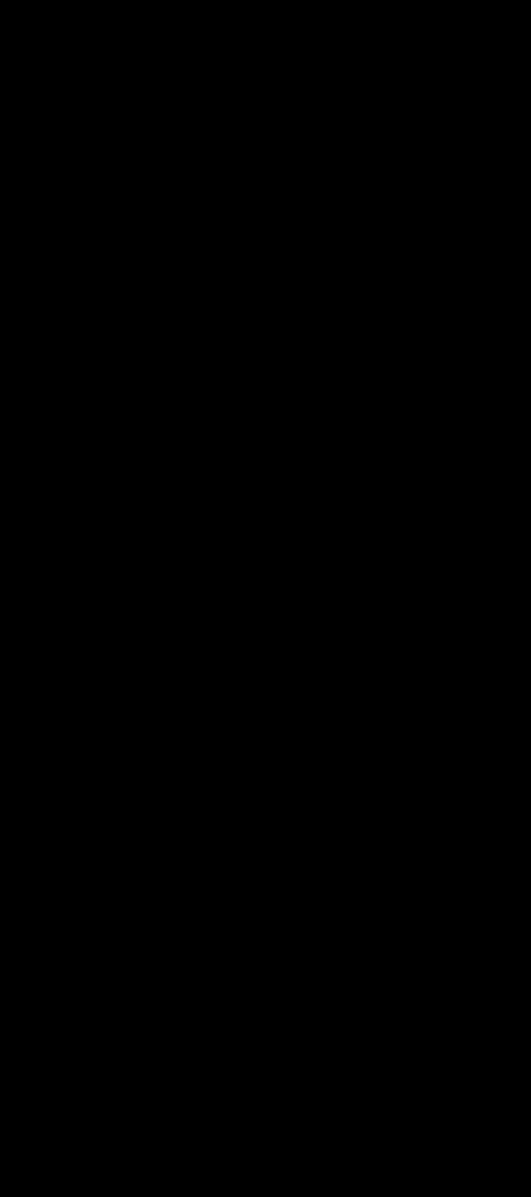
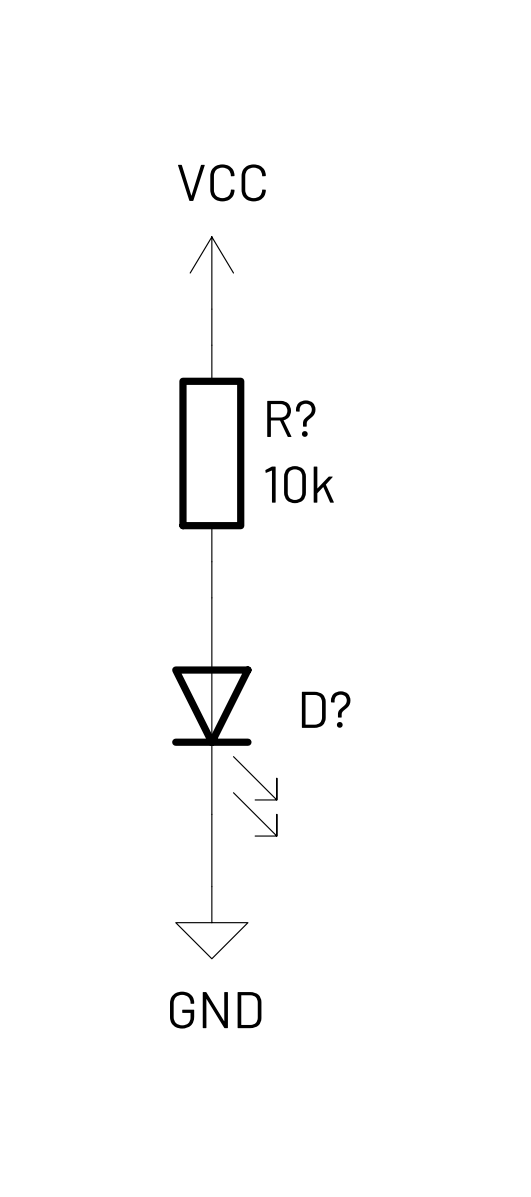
power symbol: none -> VCC (211, 273)
wire: none -> (211, 309) (211, 345)
R?: none -> 10k (211, 453)
wire: none -> (211, 561) (211, 597)
D?: none -> (224, 716)
wire: none -> (211, 814) (211, 886)
power symbol: none -> GND (211, 922)

